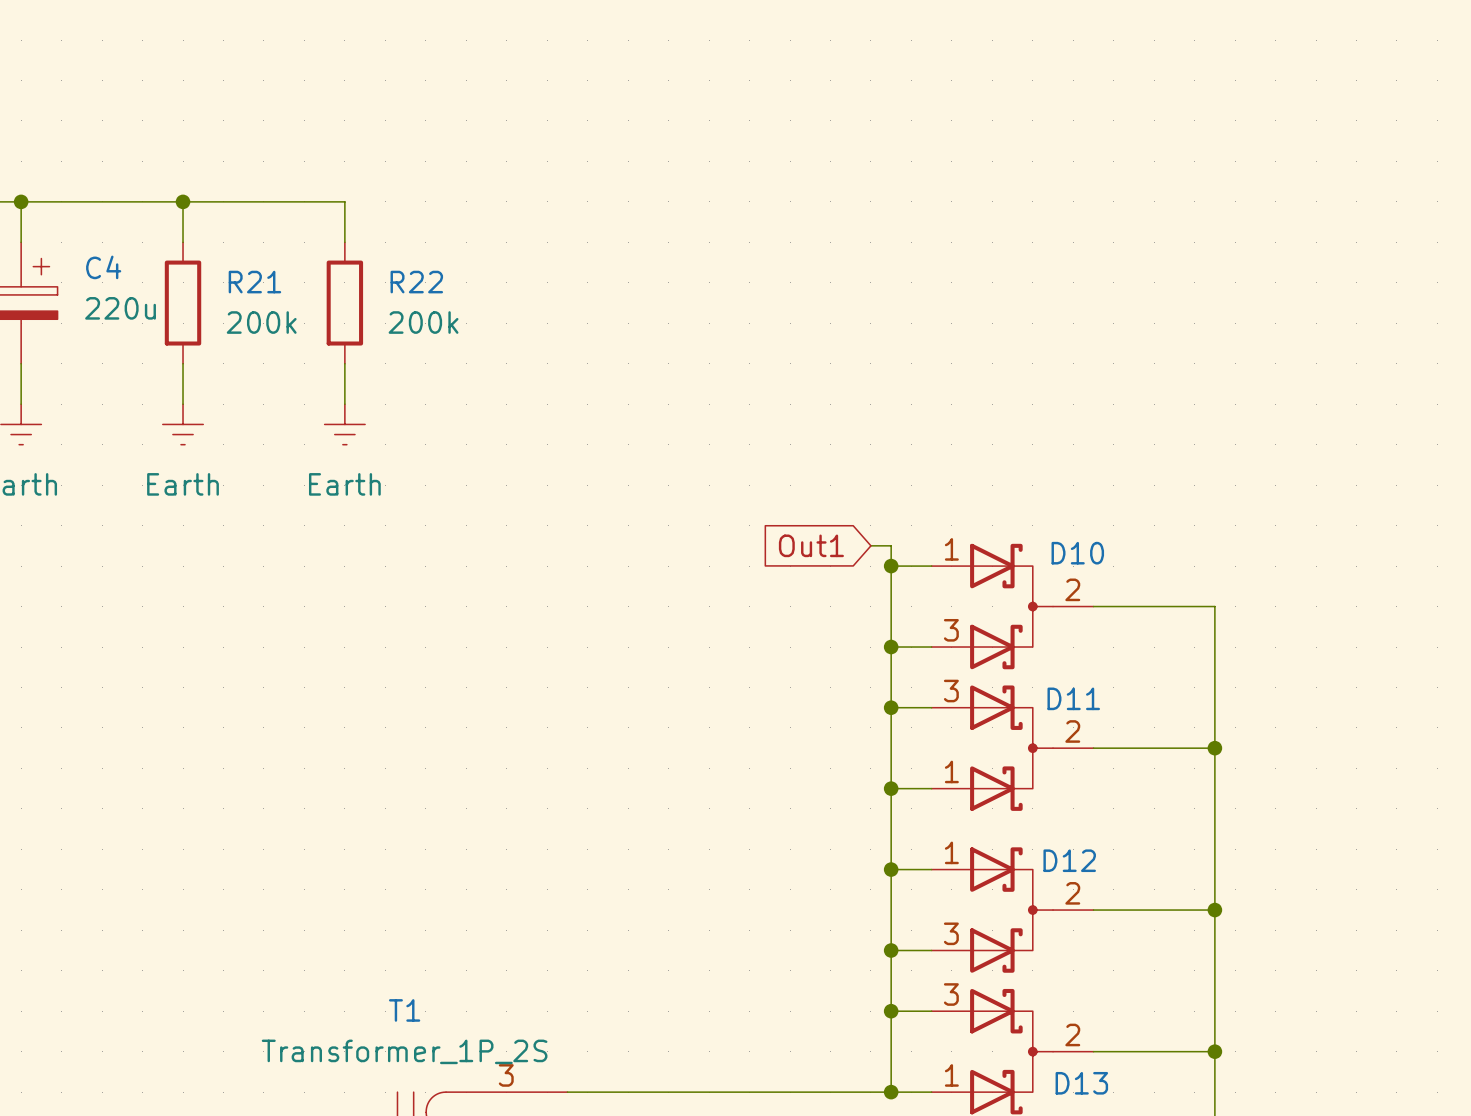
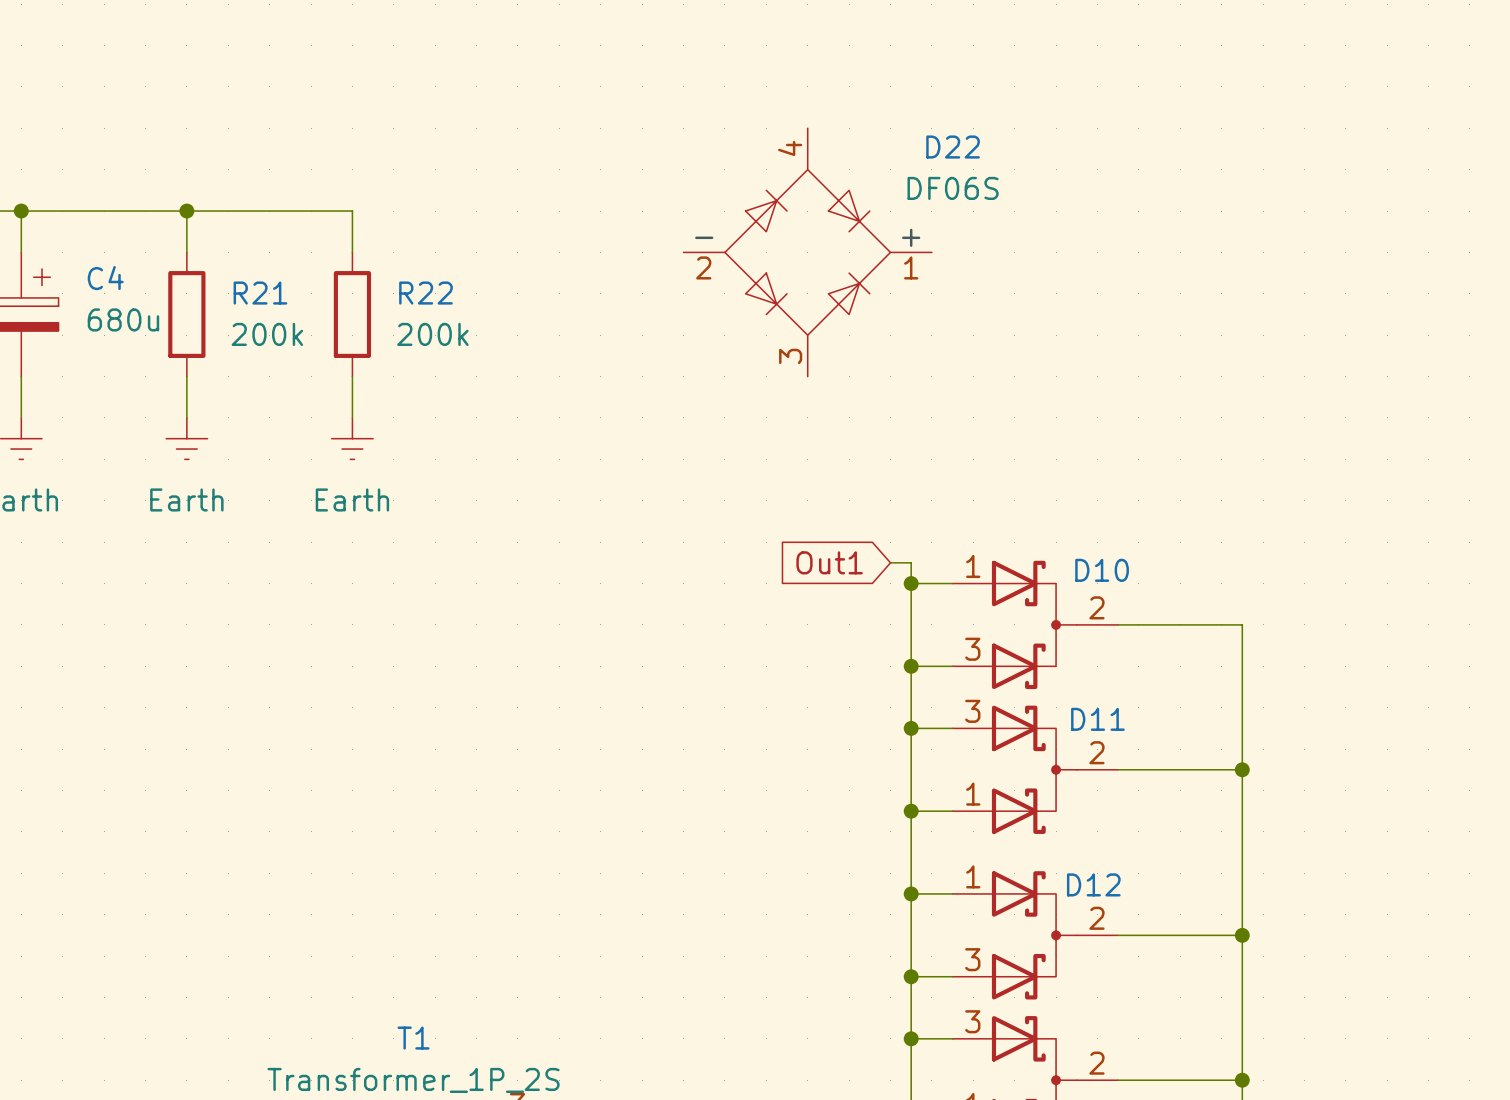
D22: none -> DF06S (807, 252)
C4 value: 220u (120, 308) -> 680u (123, 319)

